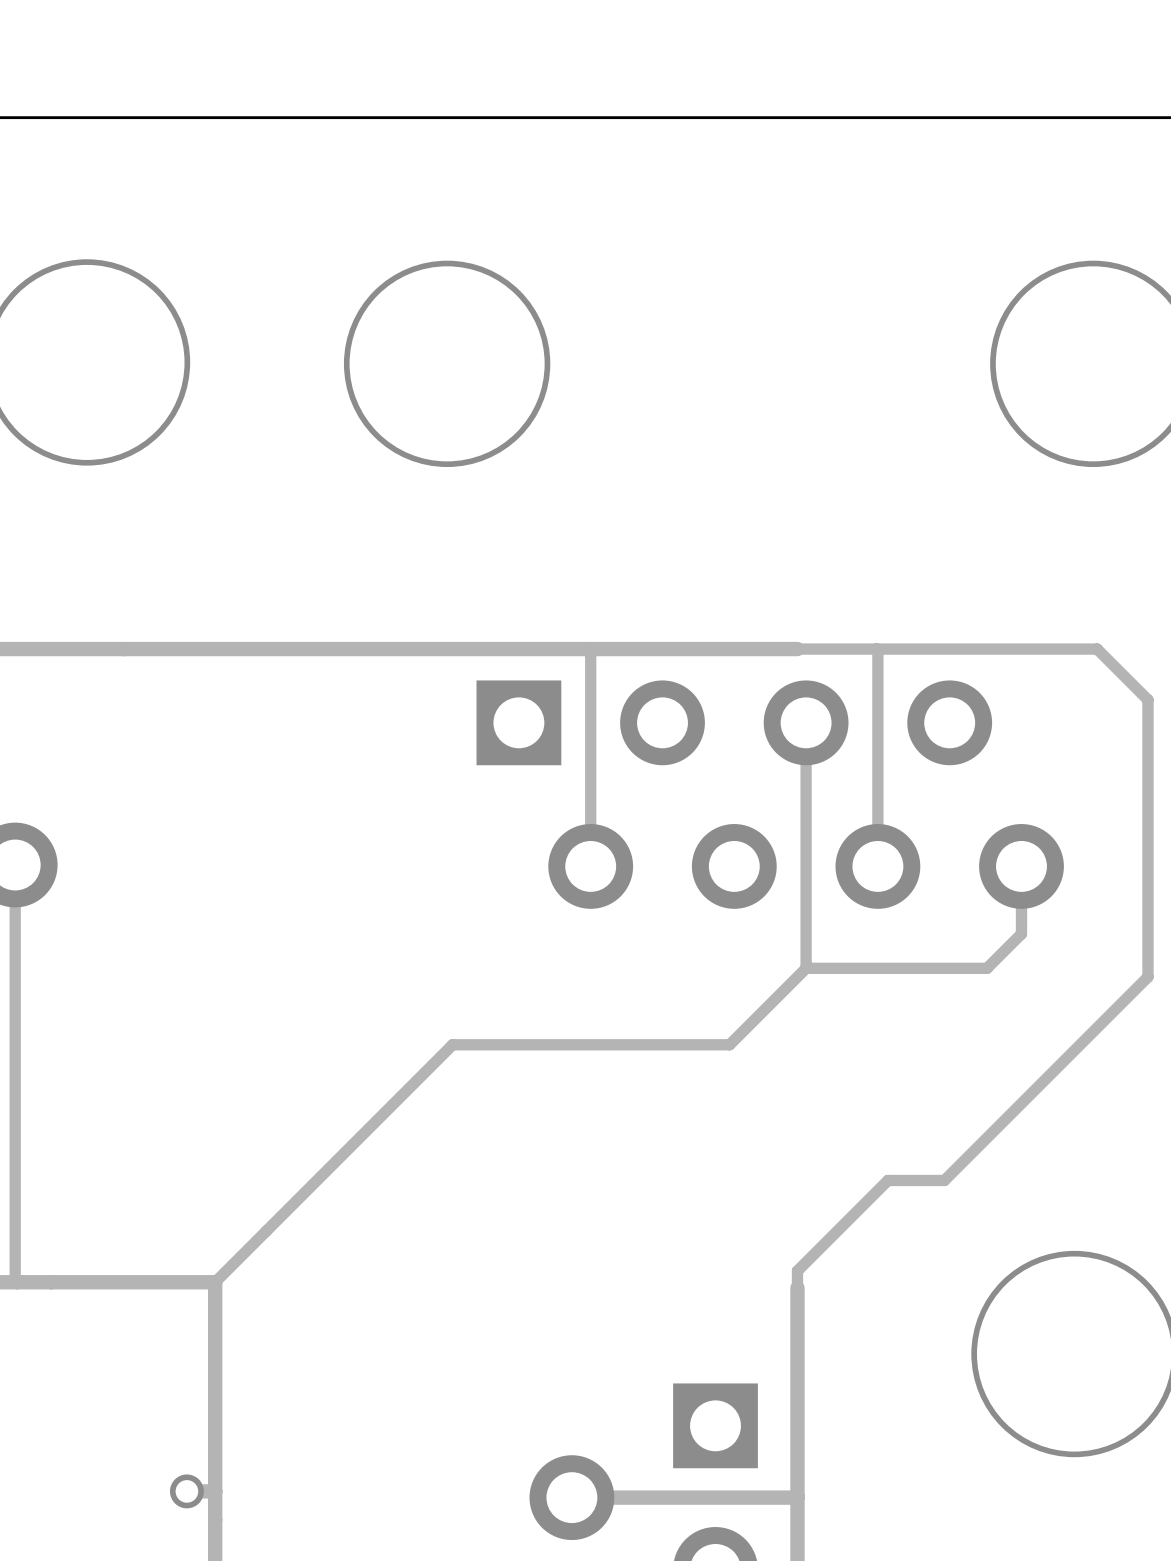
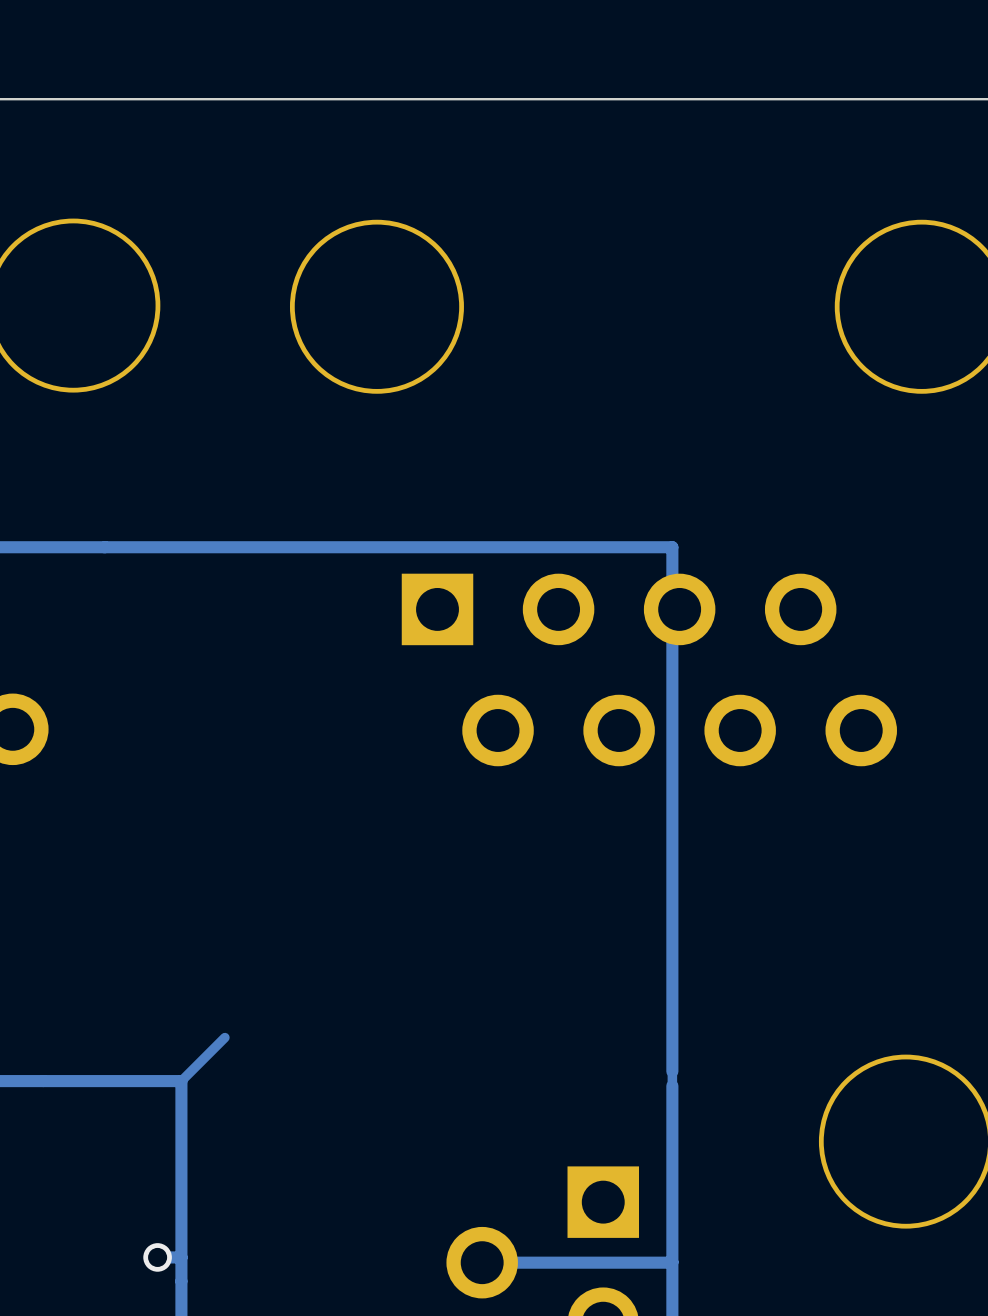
track: (588, 649) (590, 651) (590, 866) -> none
track: (797, 649) (1097, 649) (1147, 699) (1147, 976) (944, 1180) (887, 1180) (797, 1270) -> (672, 547) (672, 1071)
track: (876, 649) (877, 866) -> none
track: (806, 722) (806, 968) -> none
track: (15, 865) (15, 1280) (17, 1282) -> none
track: (1021, 866) (1021, 933) (987, 968) (806, 968) -> none
track: (806, 968) (729, 1044) (452, 1044) (266, 1230) -> none

